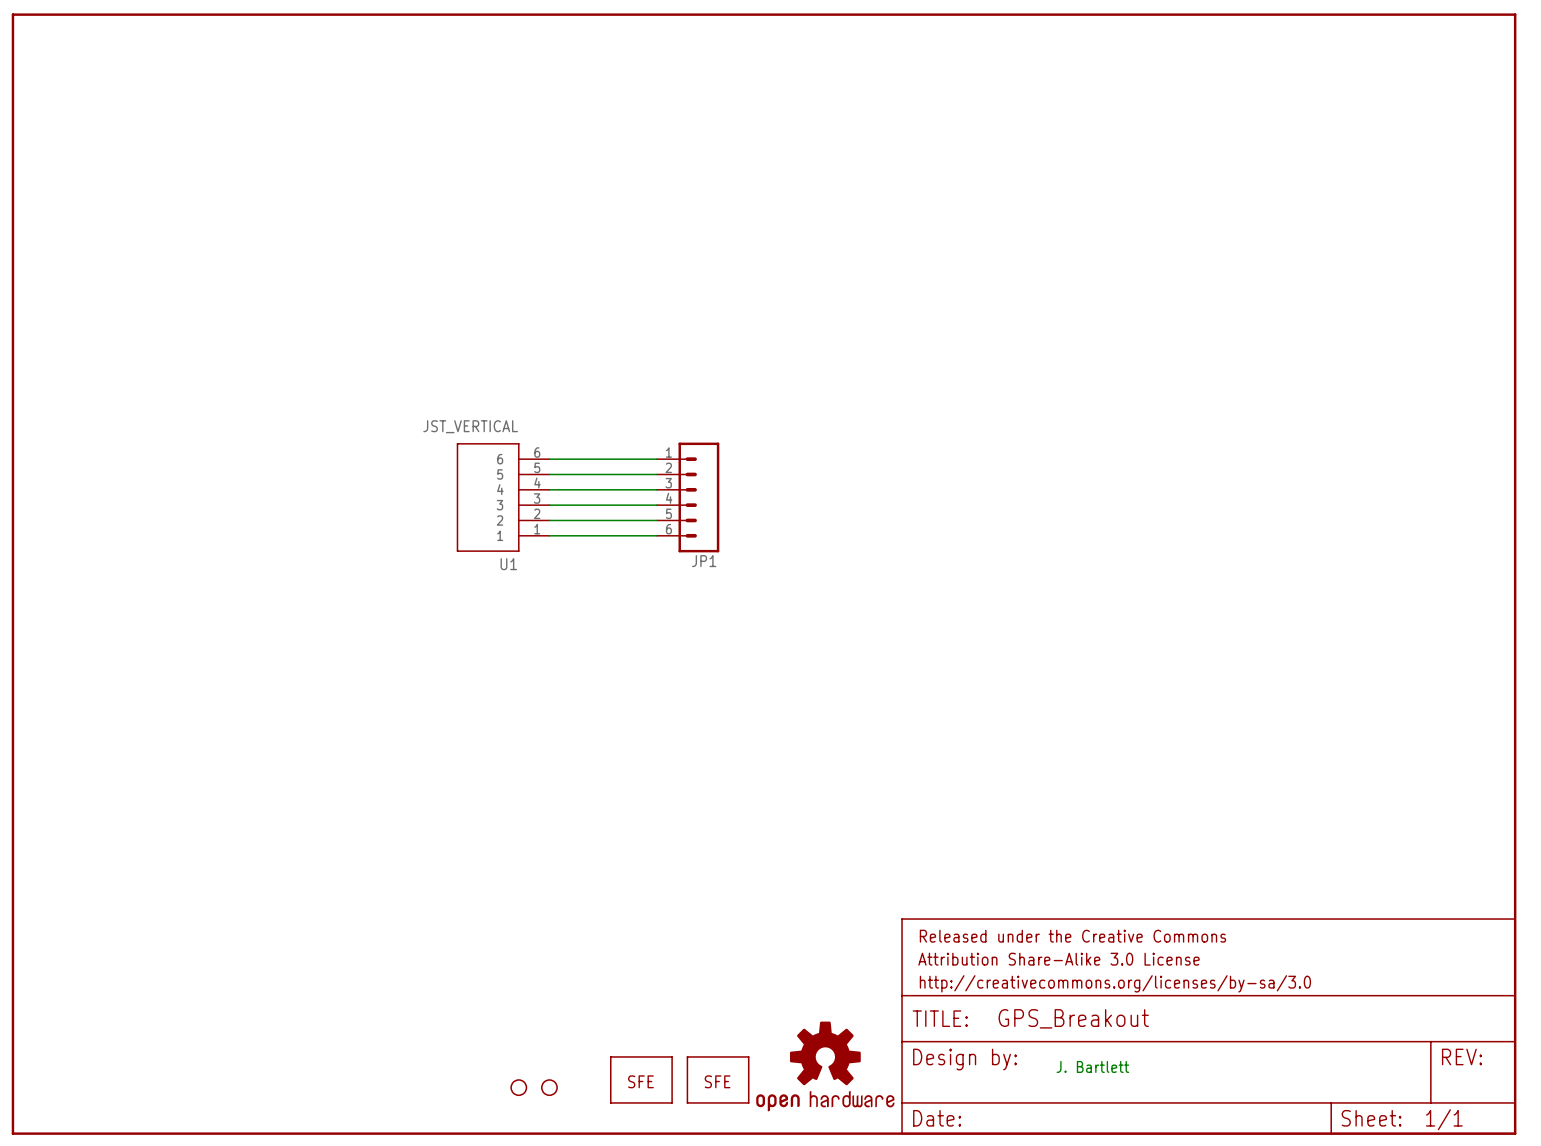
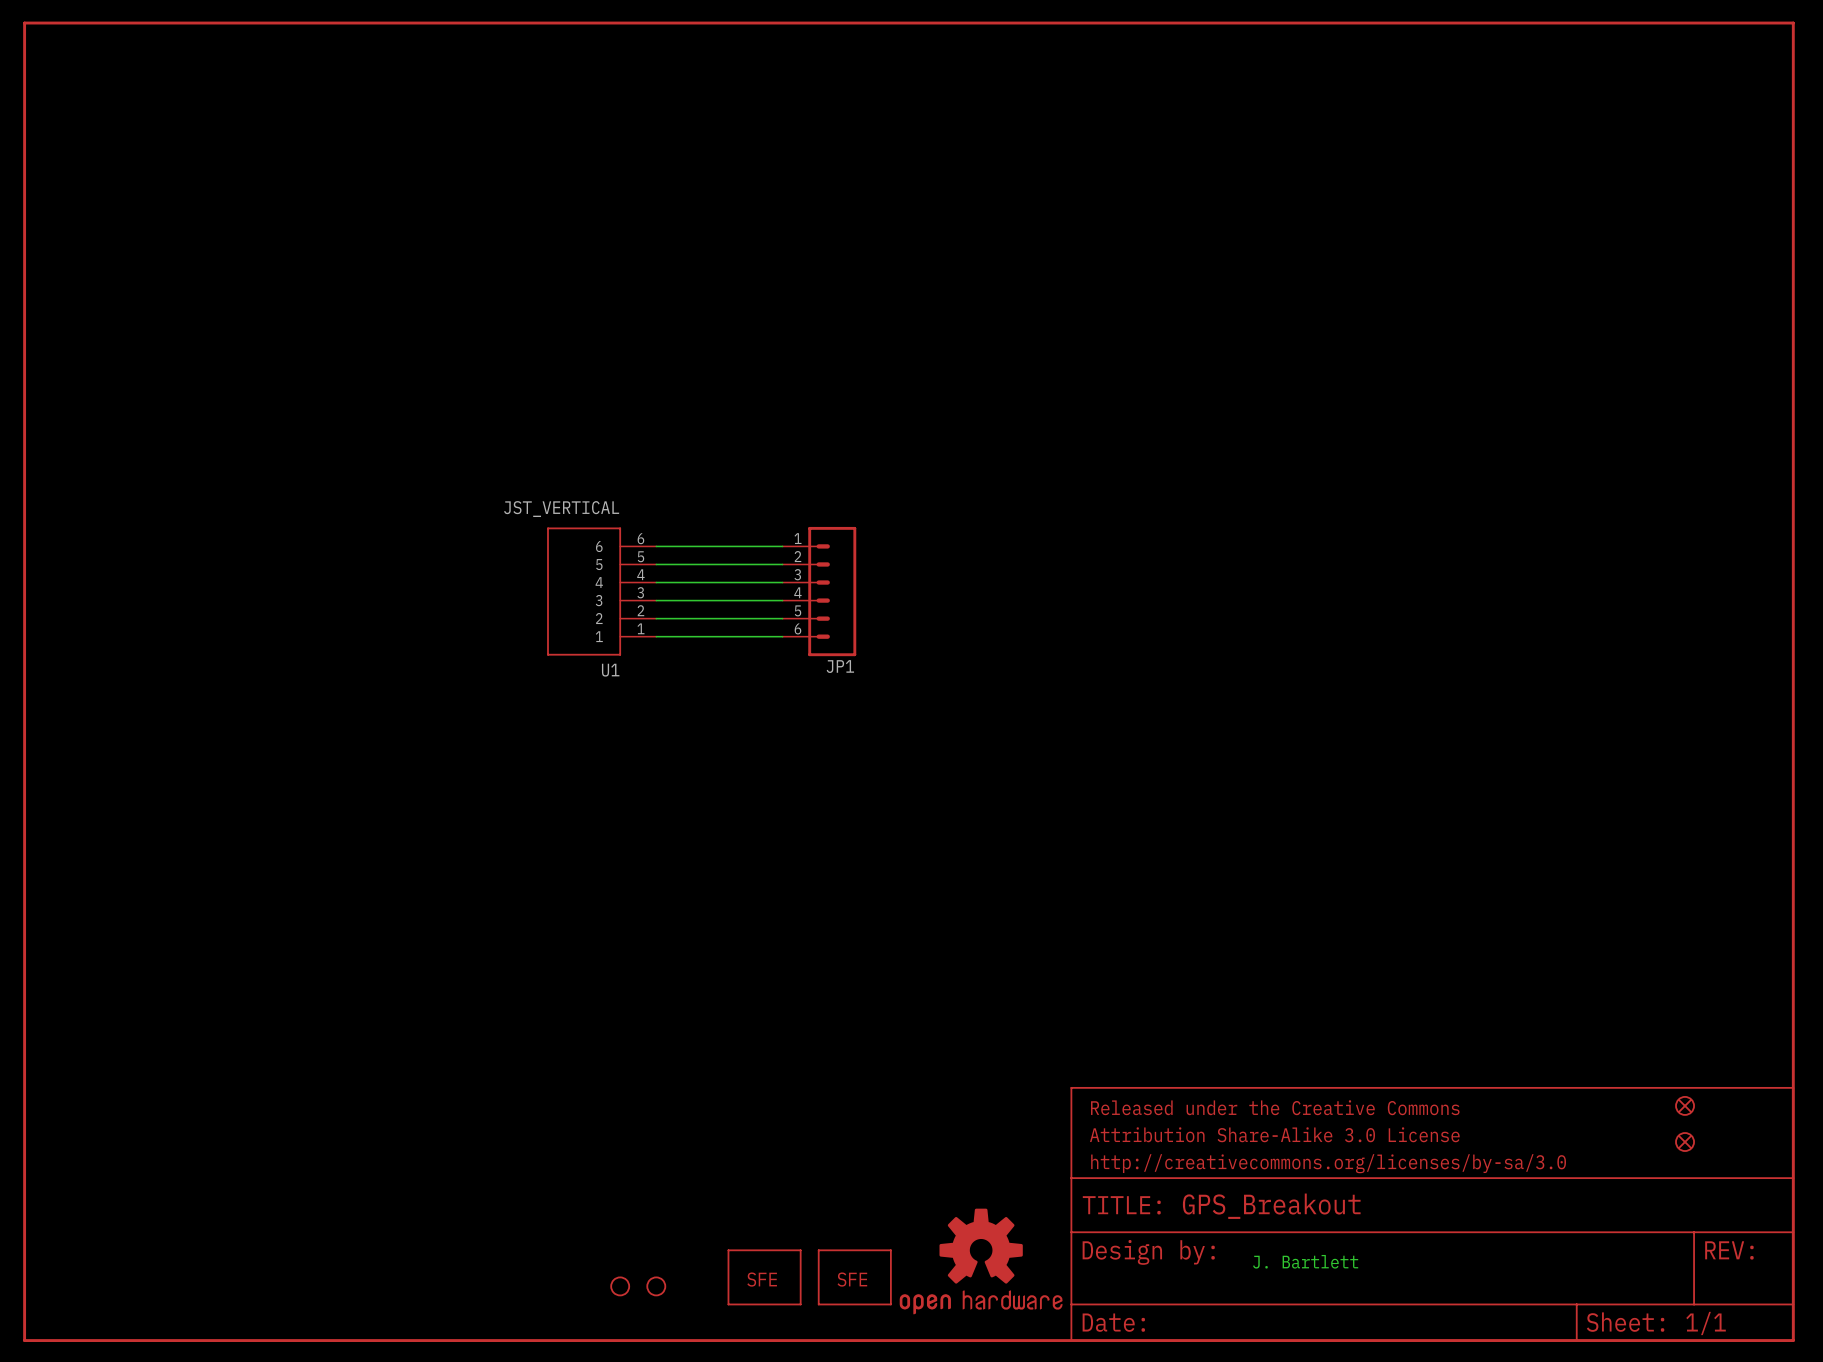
part: none -> (1685, 1105)
part: none -> (1685, 1142)

